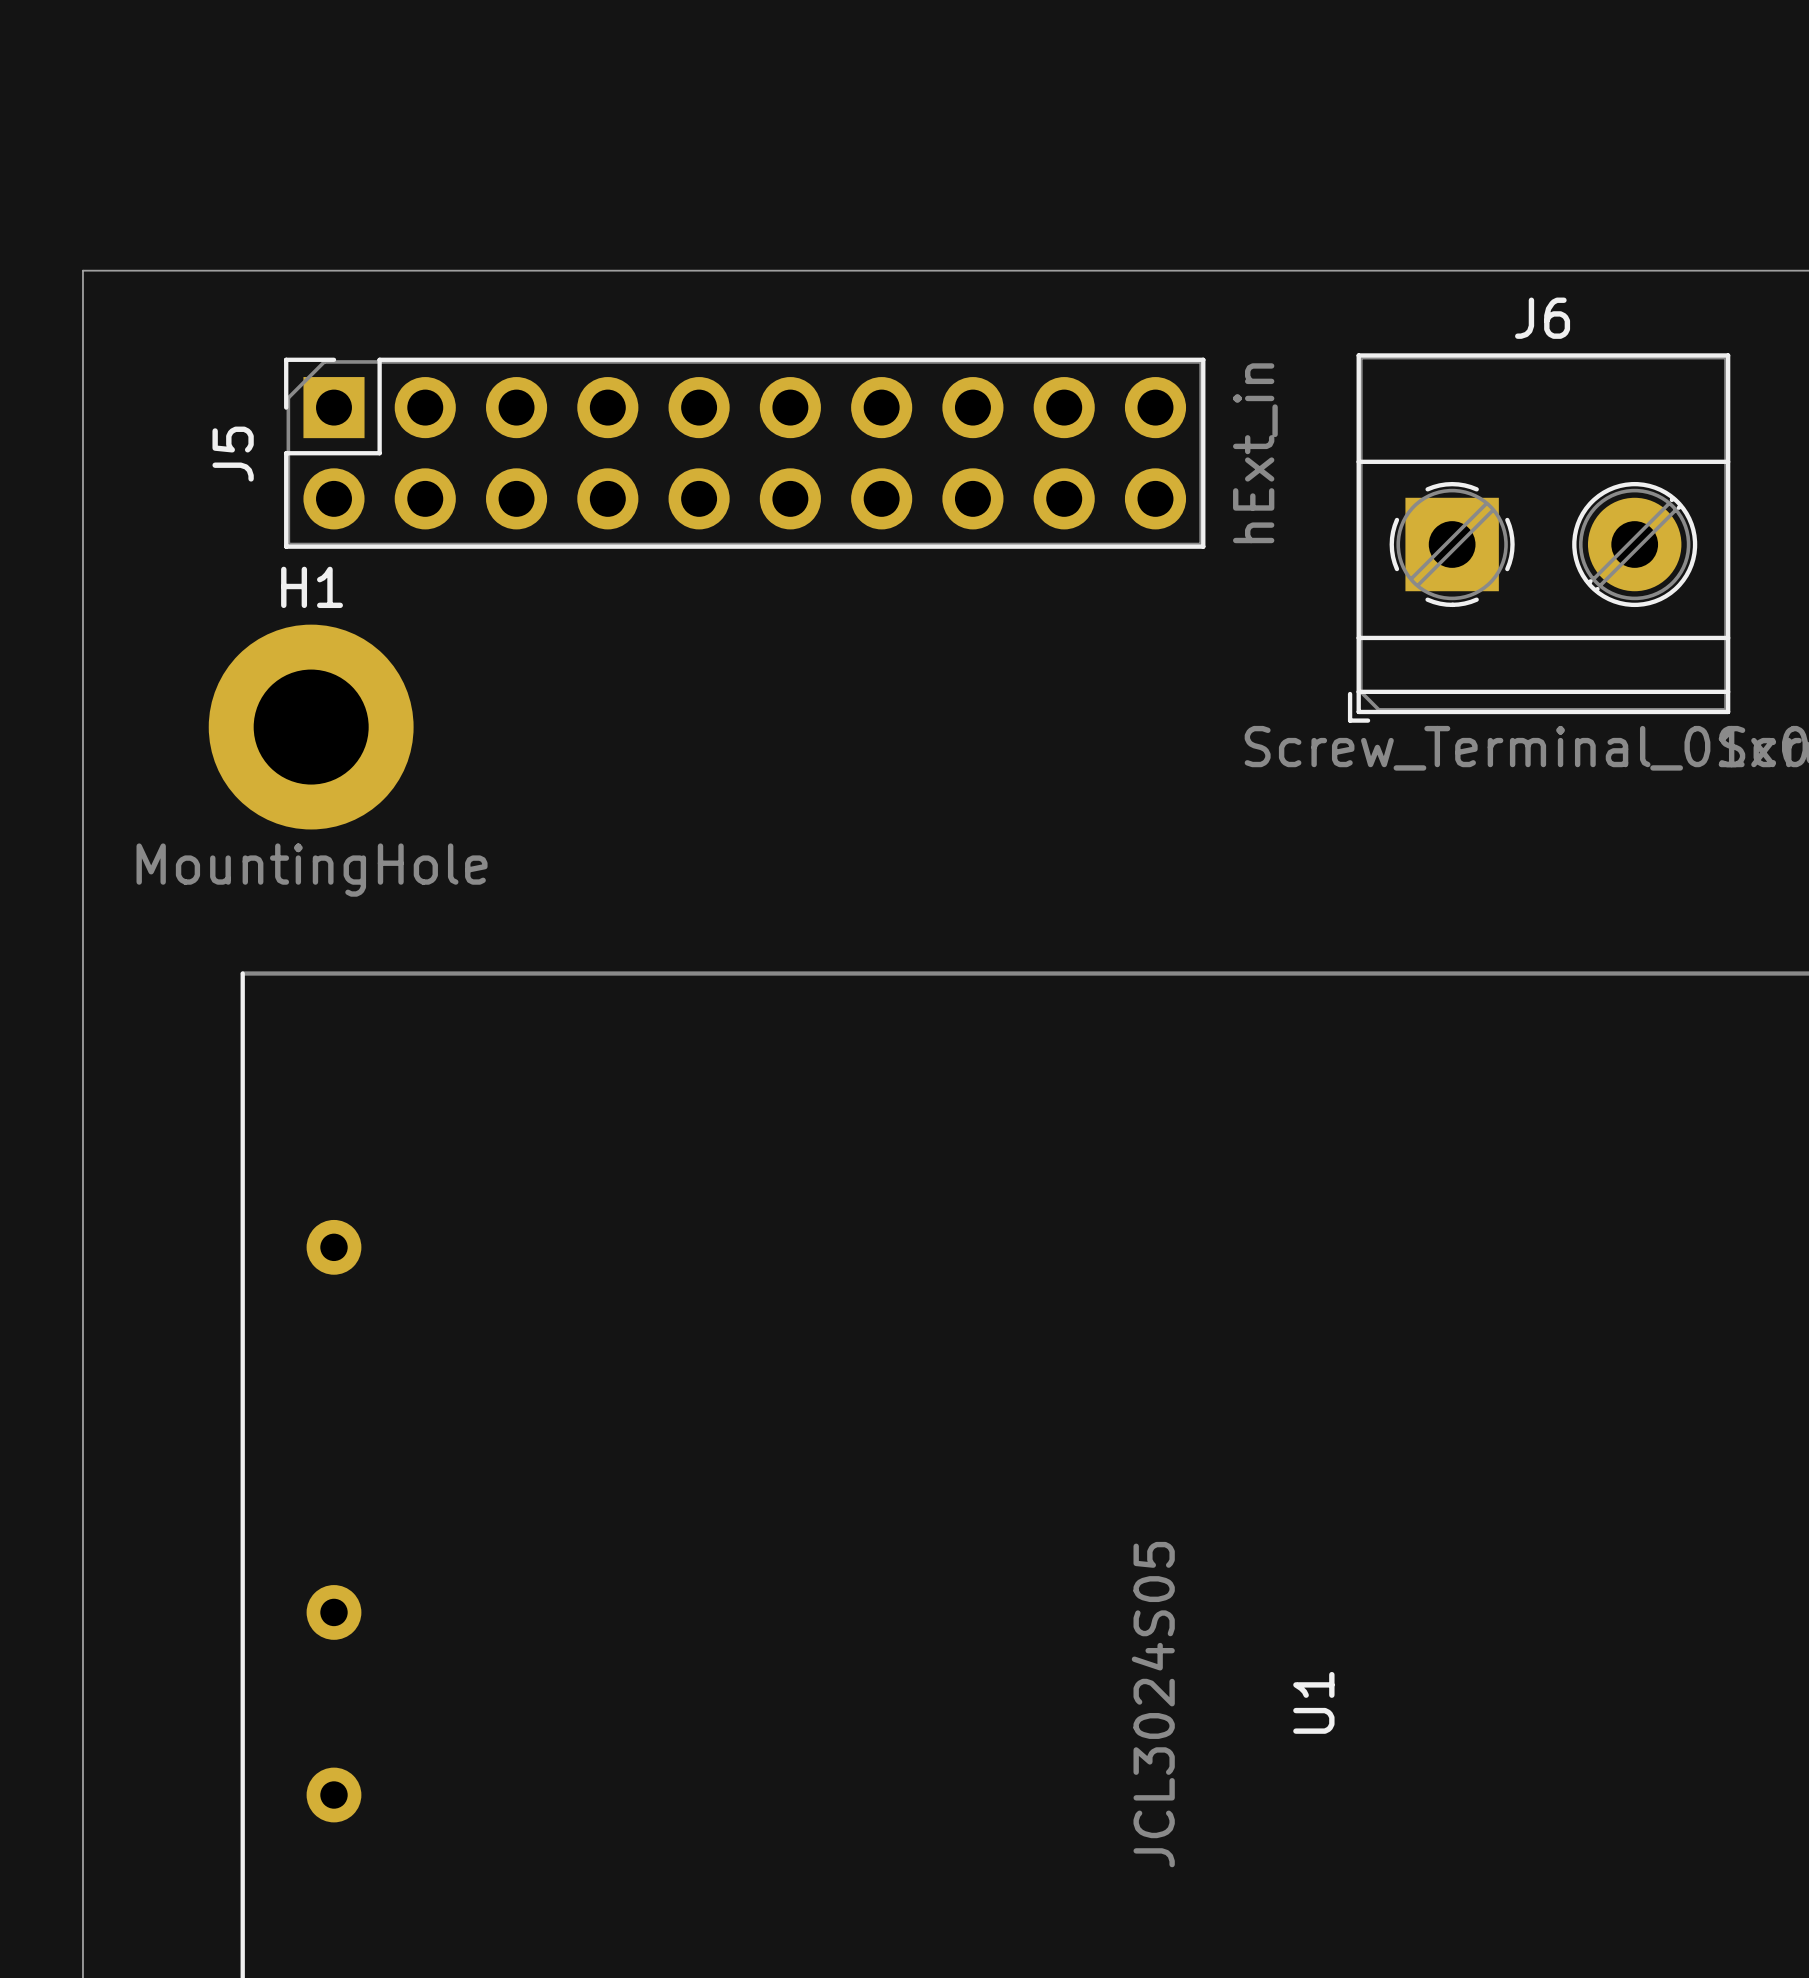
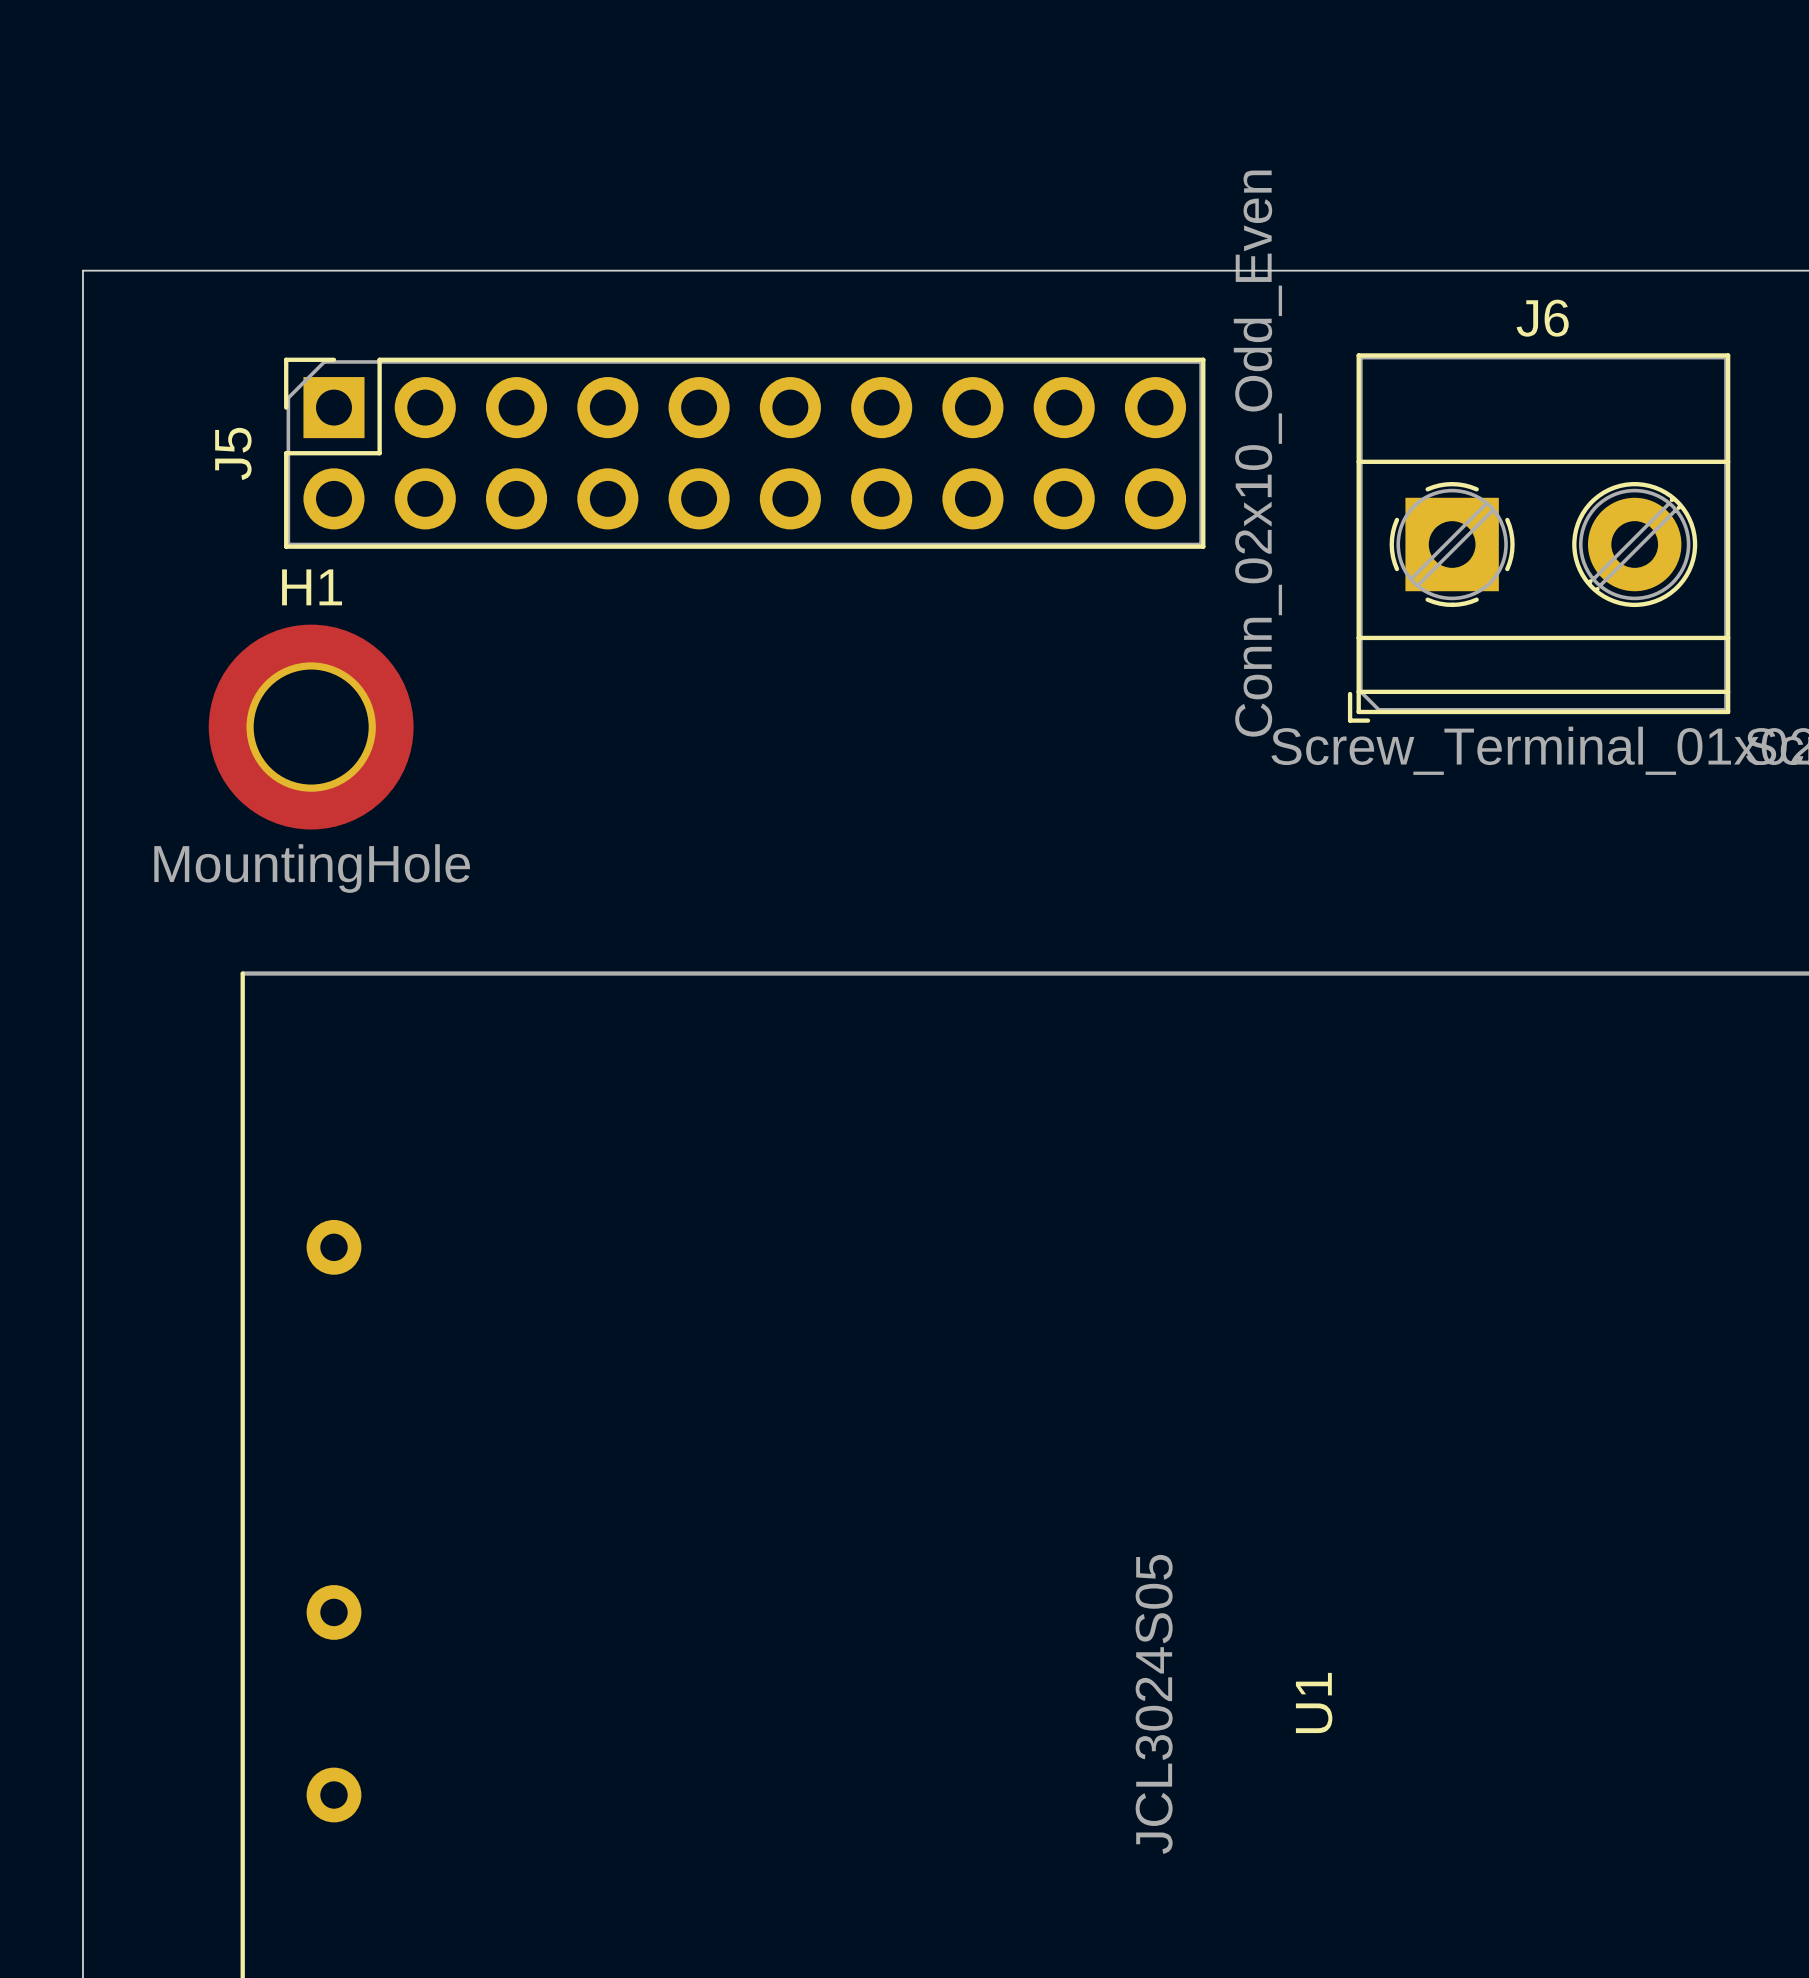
J5 value: hExt_in (1255, 453) -> Conn_02x10_Odd_Even (1257, 453)

